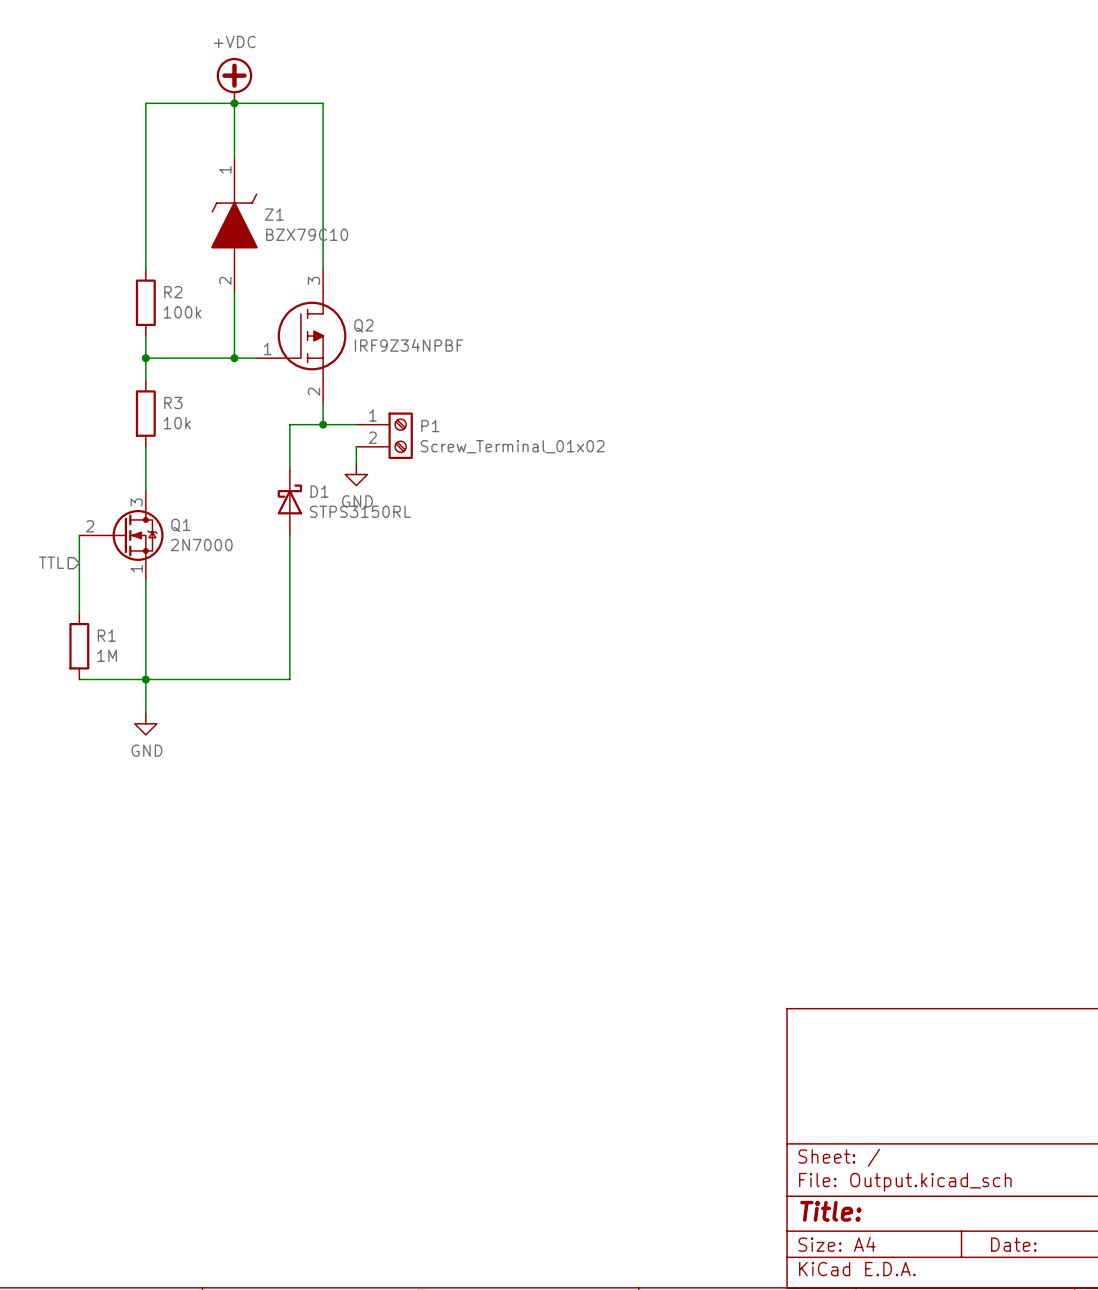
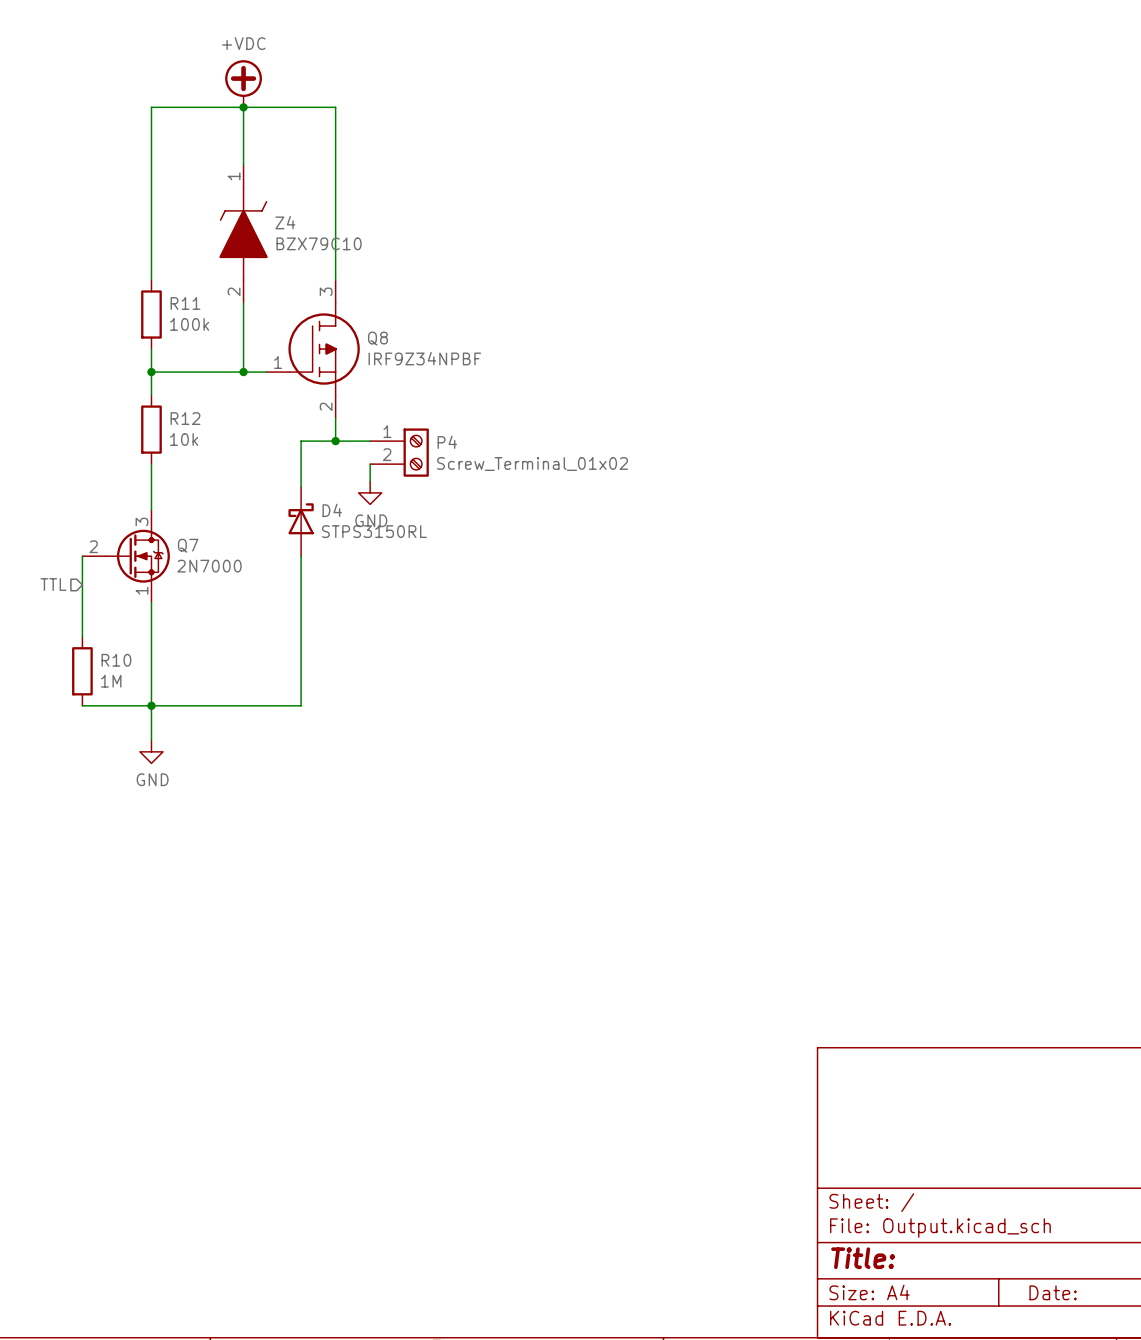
Z1 name: Z1 (274, 214) -> Z4 (285, 222)
R2 name: R2 (173, 292) -> R11 (185, 303)
Q2 name: Q2 (363, 325) -> Q8 (377, 338)
R3 name: R3 (173, 402) -> R12 (185, 418)
P1 name: P1 (430, 426) -> P4 (447, 442)
D1 name: D1 (319, 491) -> D4 (332, 510)
Q1 name: Q1 (180, 525) -> Q7 (188, 545)
R1 name: R1 (106, 635) -> R10 (116, 660)

